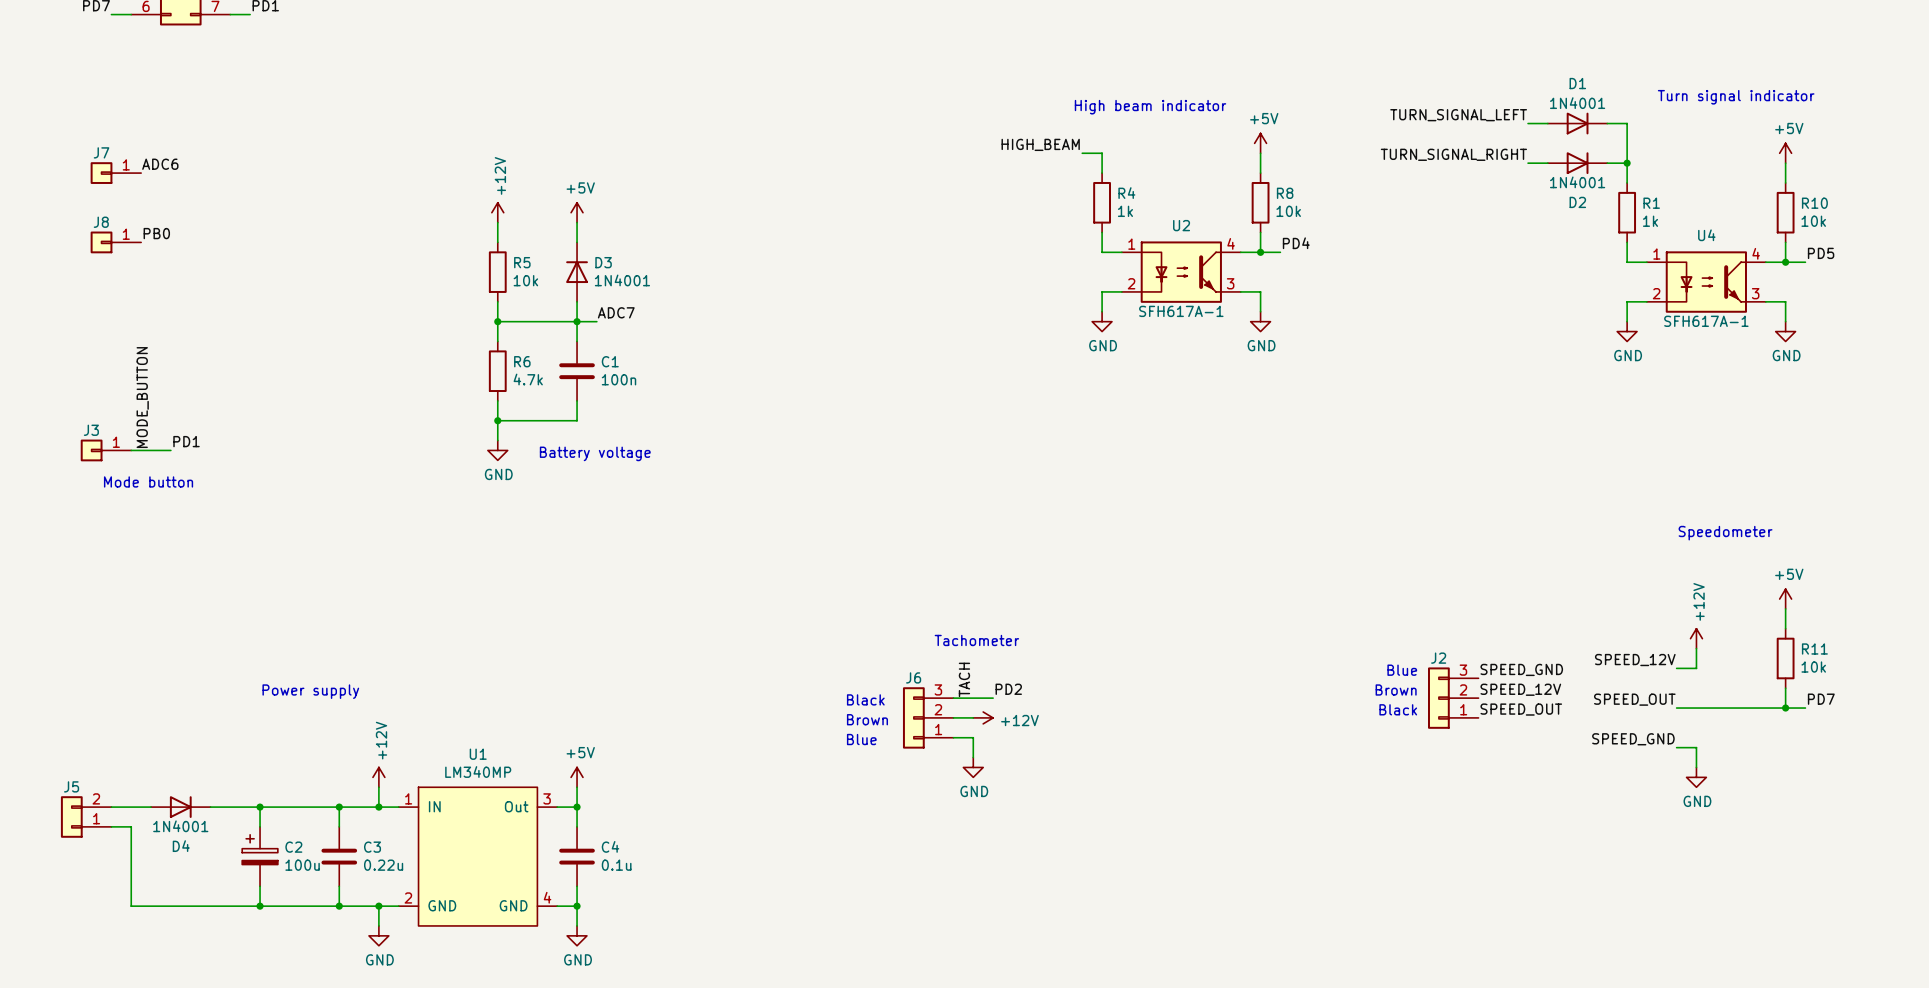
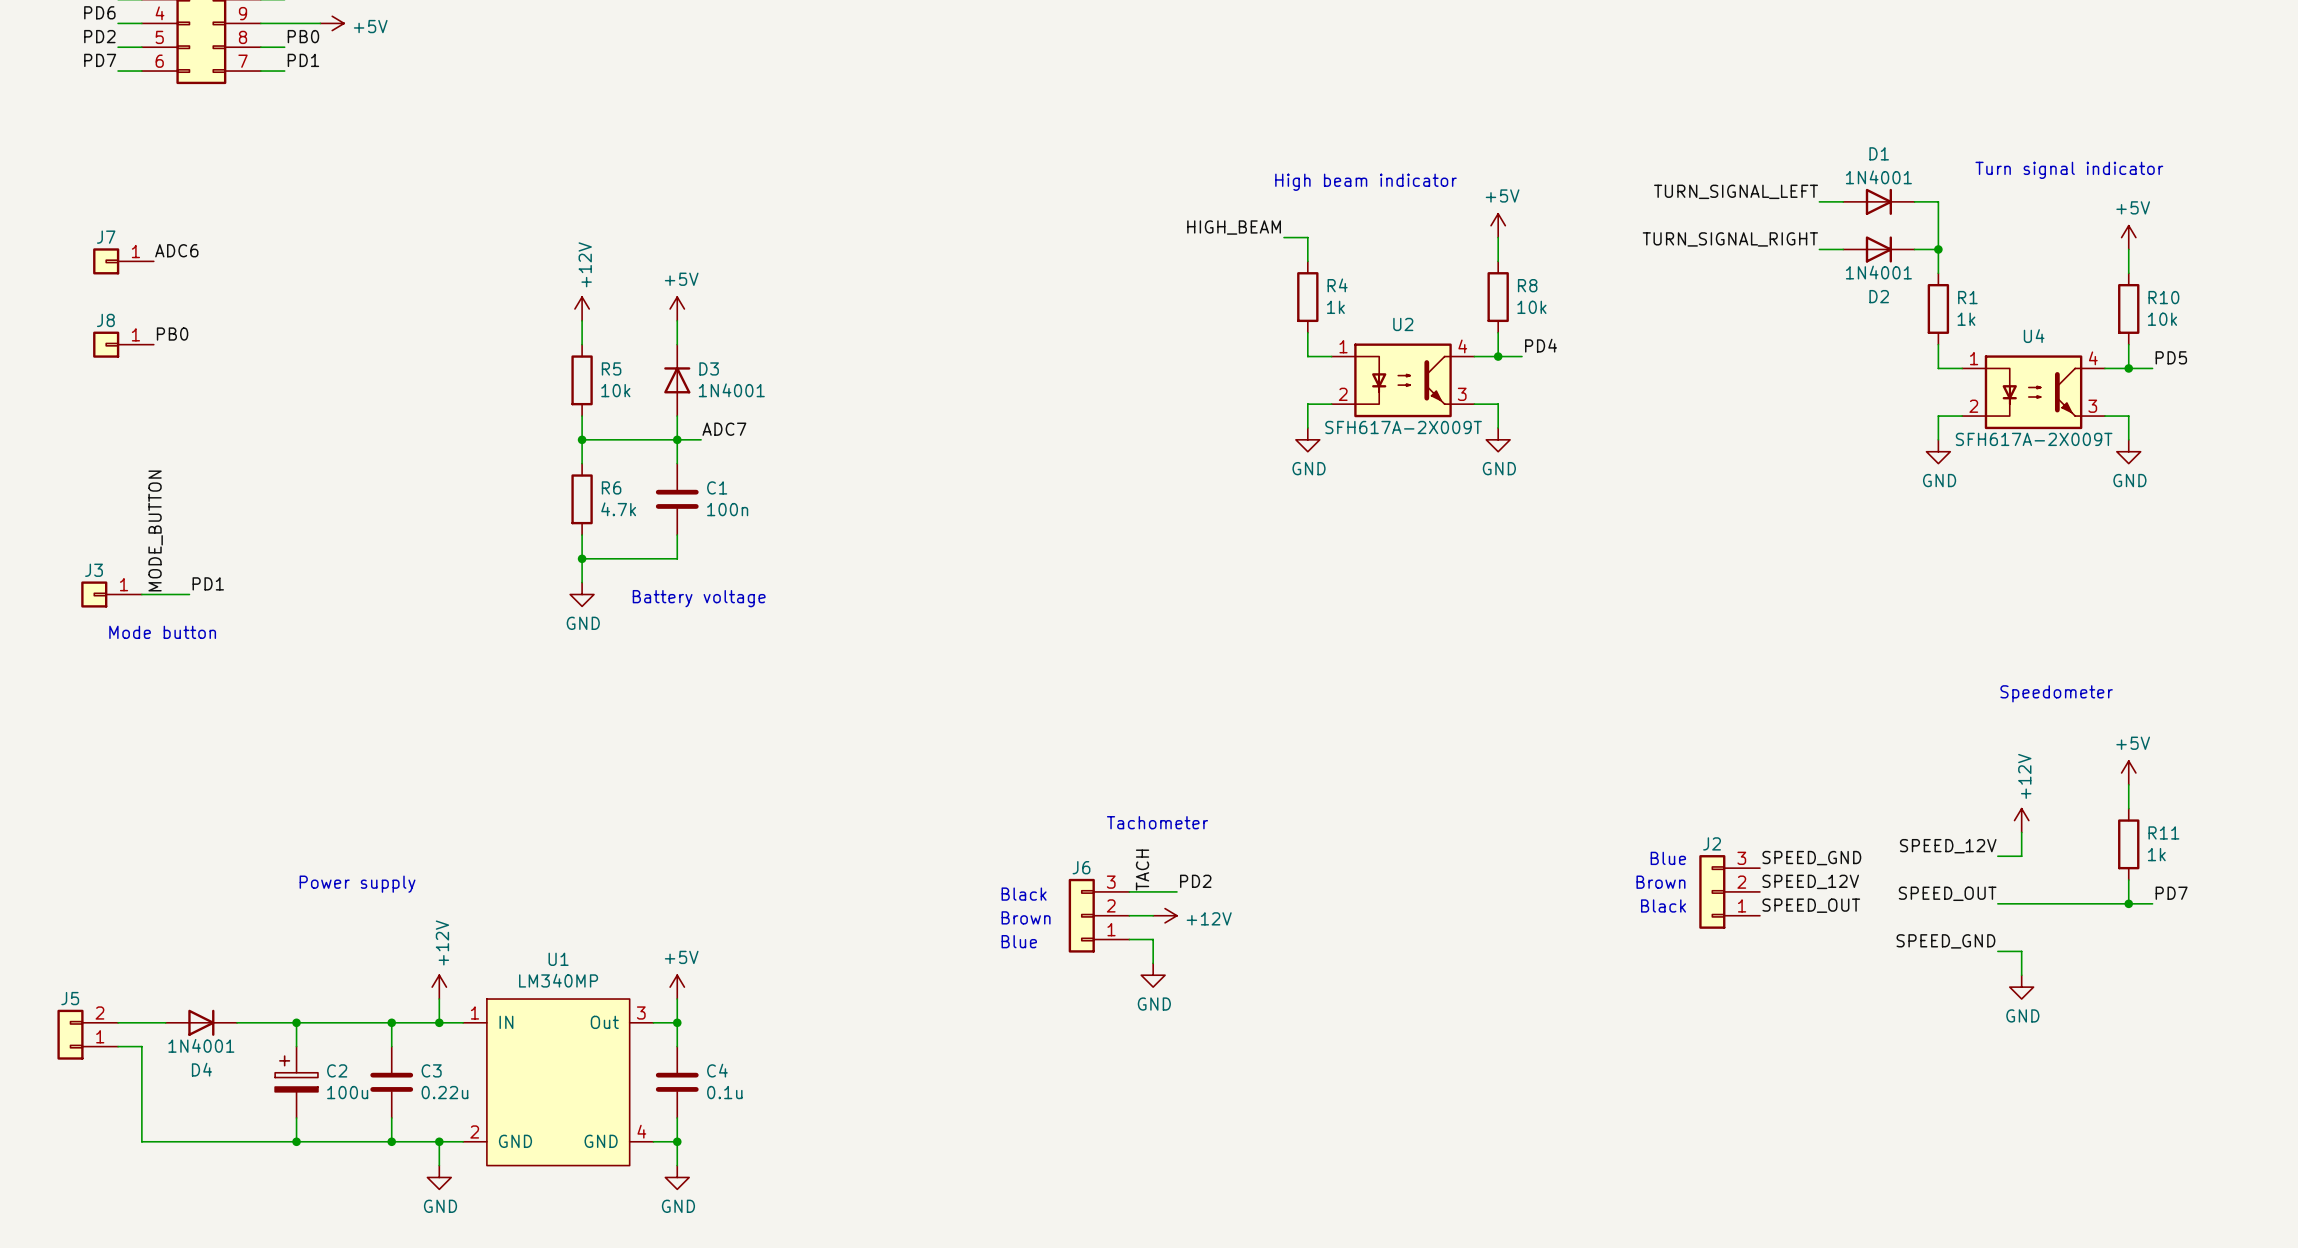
U2 value: SFH617A-1 (1181, 311) -> SFH617A-2X009T (1403, 427)
U4 value: SFH617A-1 (1706, 321) -> SFH617A-2X009T (2034, 439)
R11 value: 10k (1813, 667) -> 1k (2156, 854)

